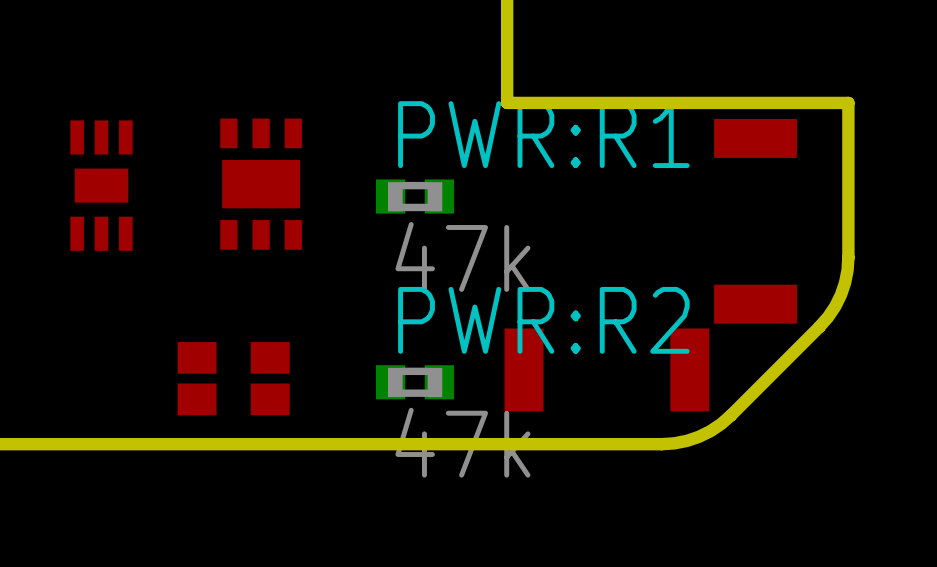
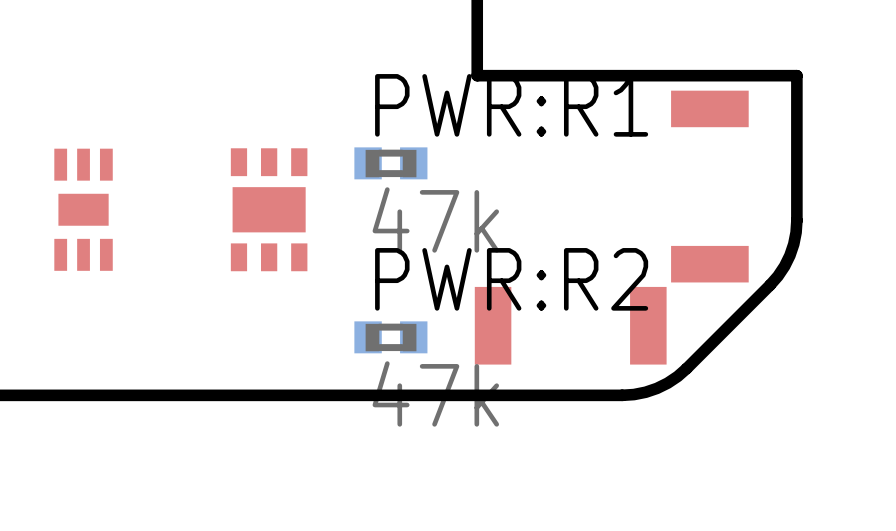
part position: (261, 184) -> (269, 209)
part position: (101, 185) -> (83, 209)
part: (233, 378) -> none

